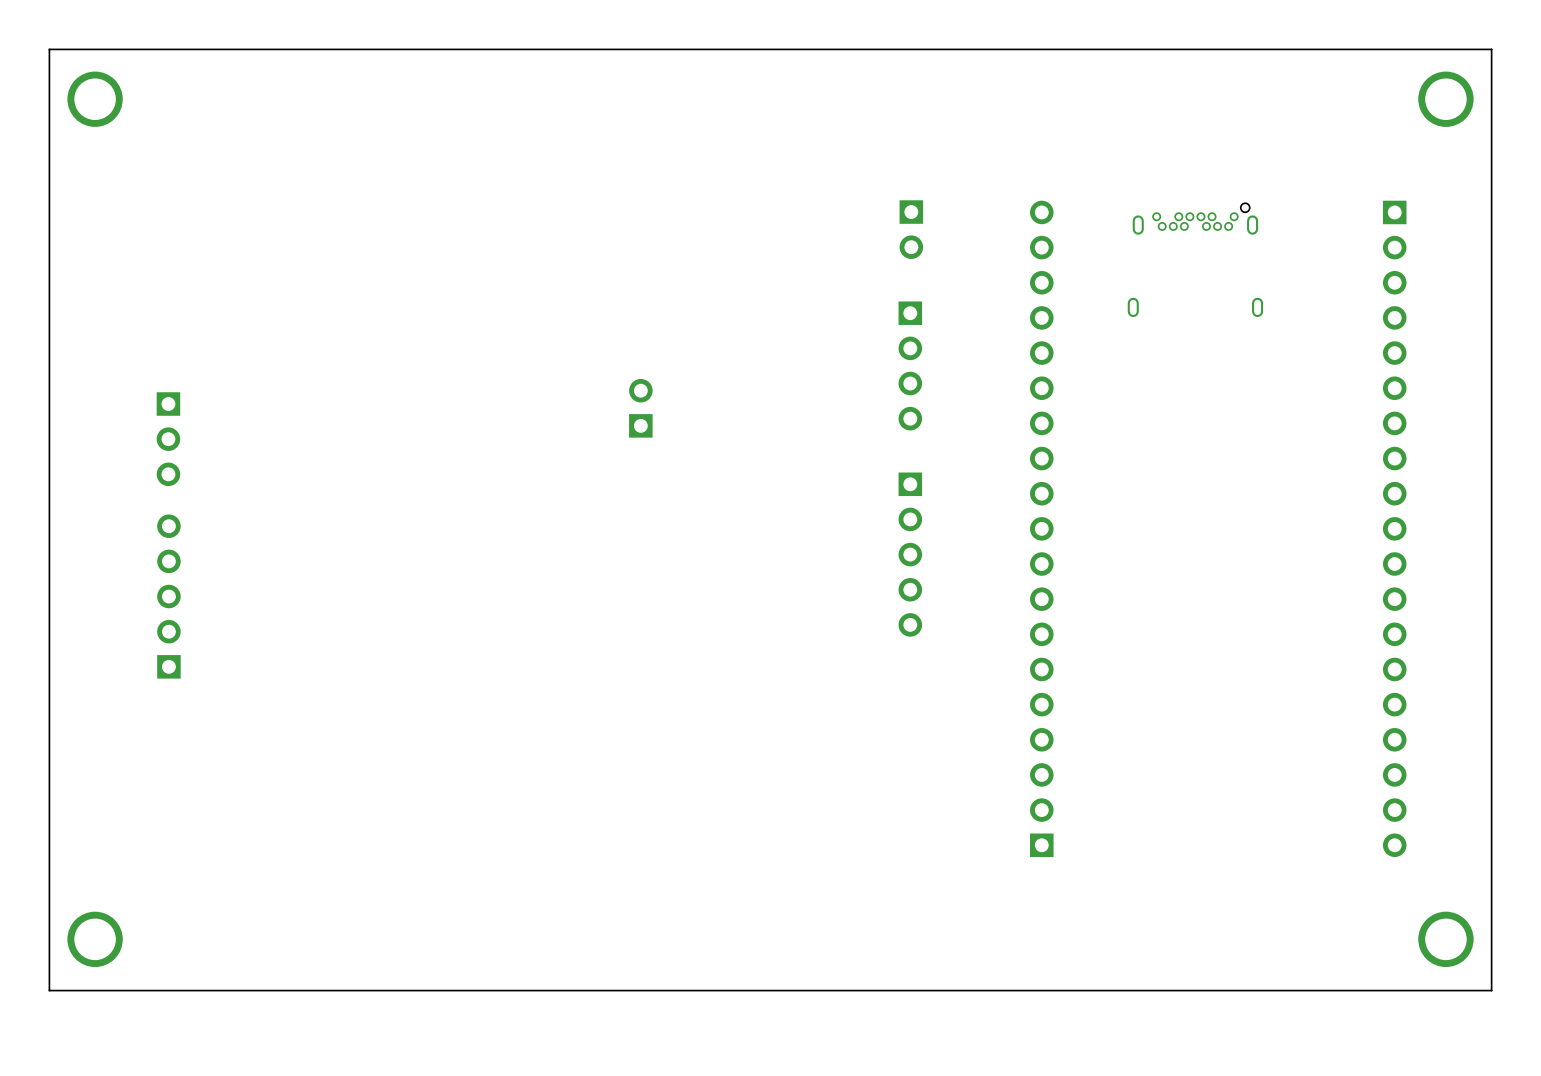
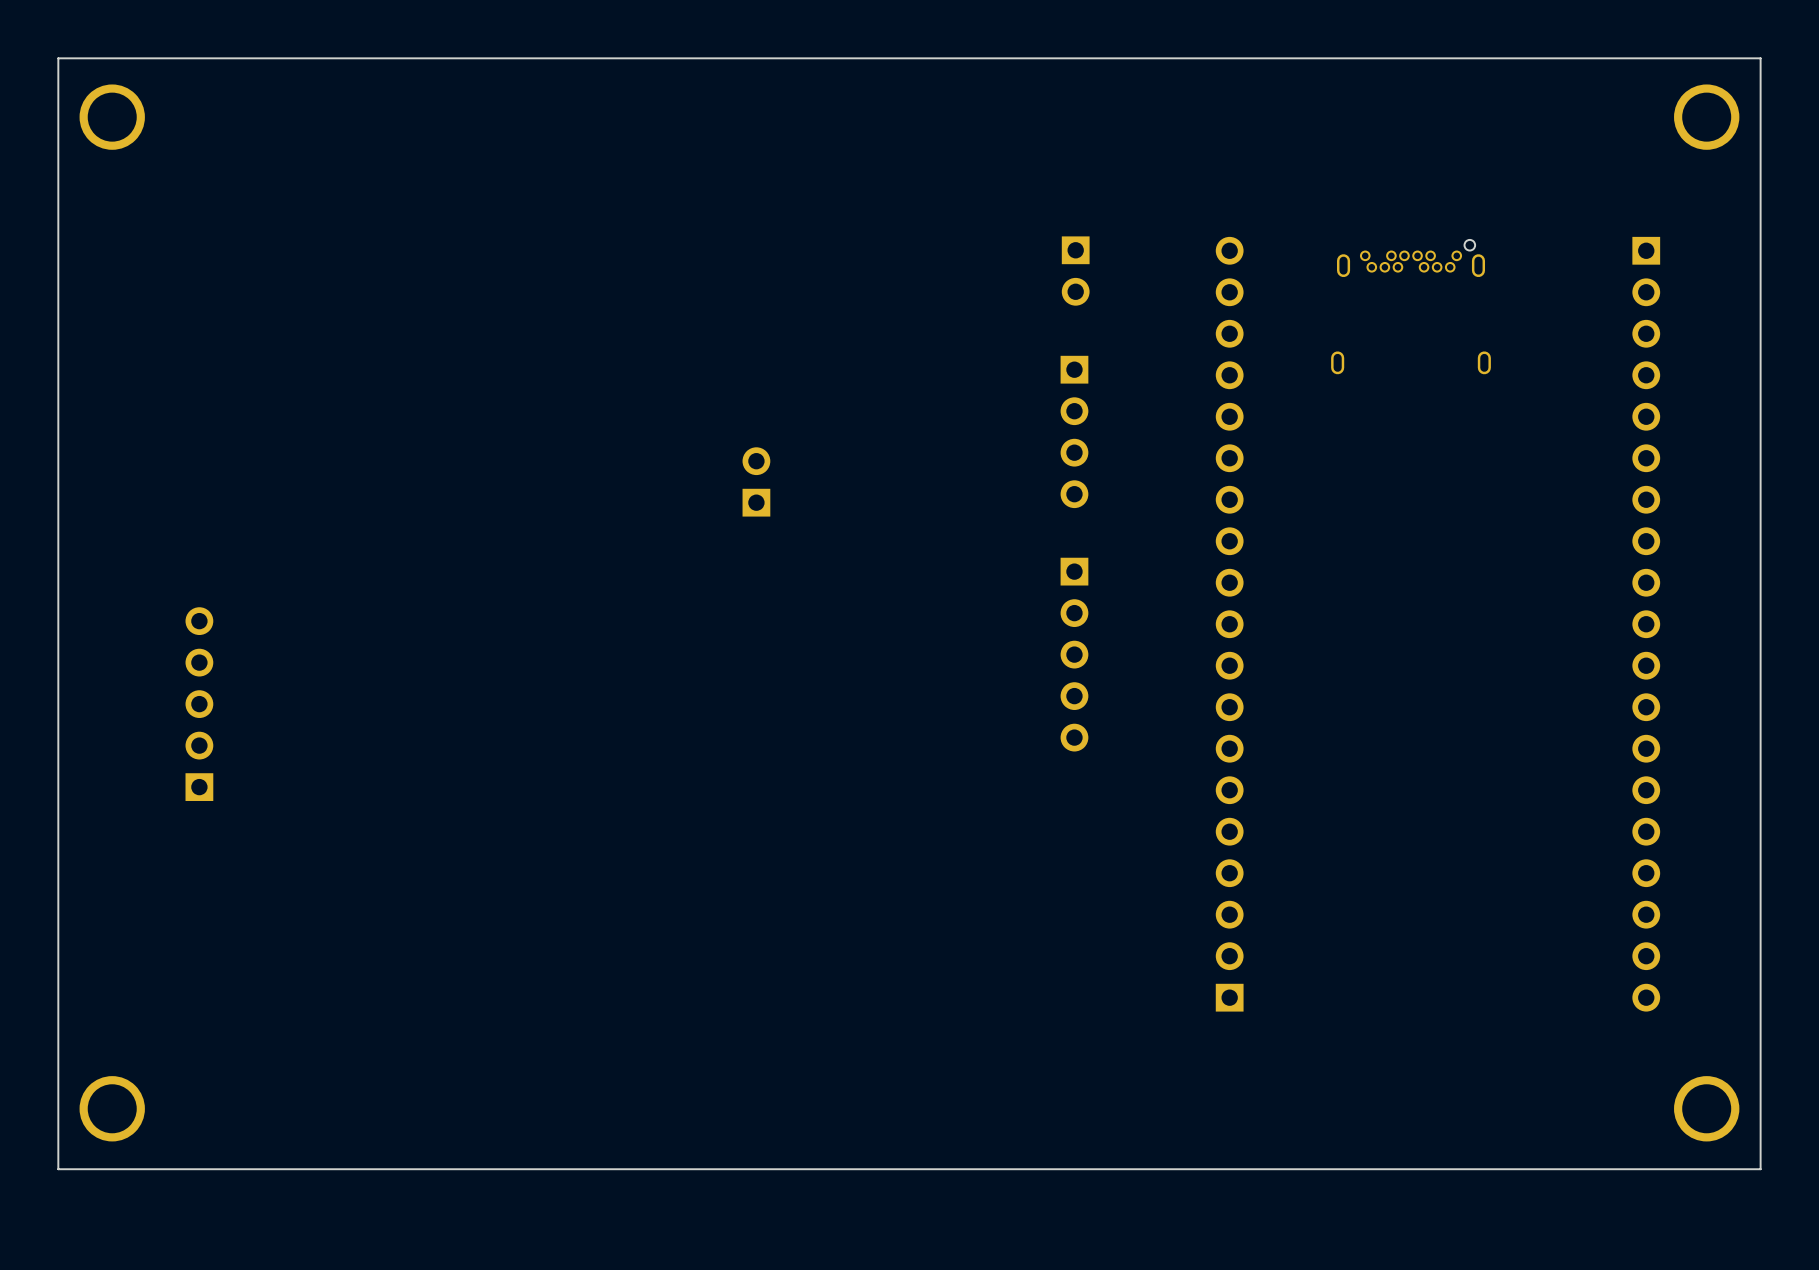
part: (168, 439) -> none

